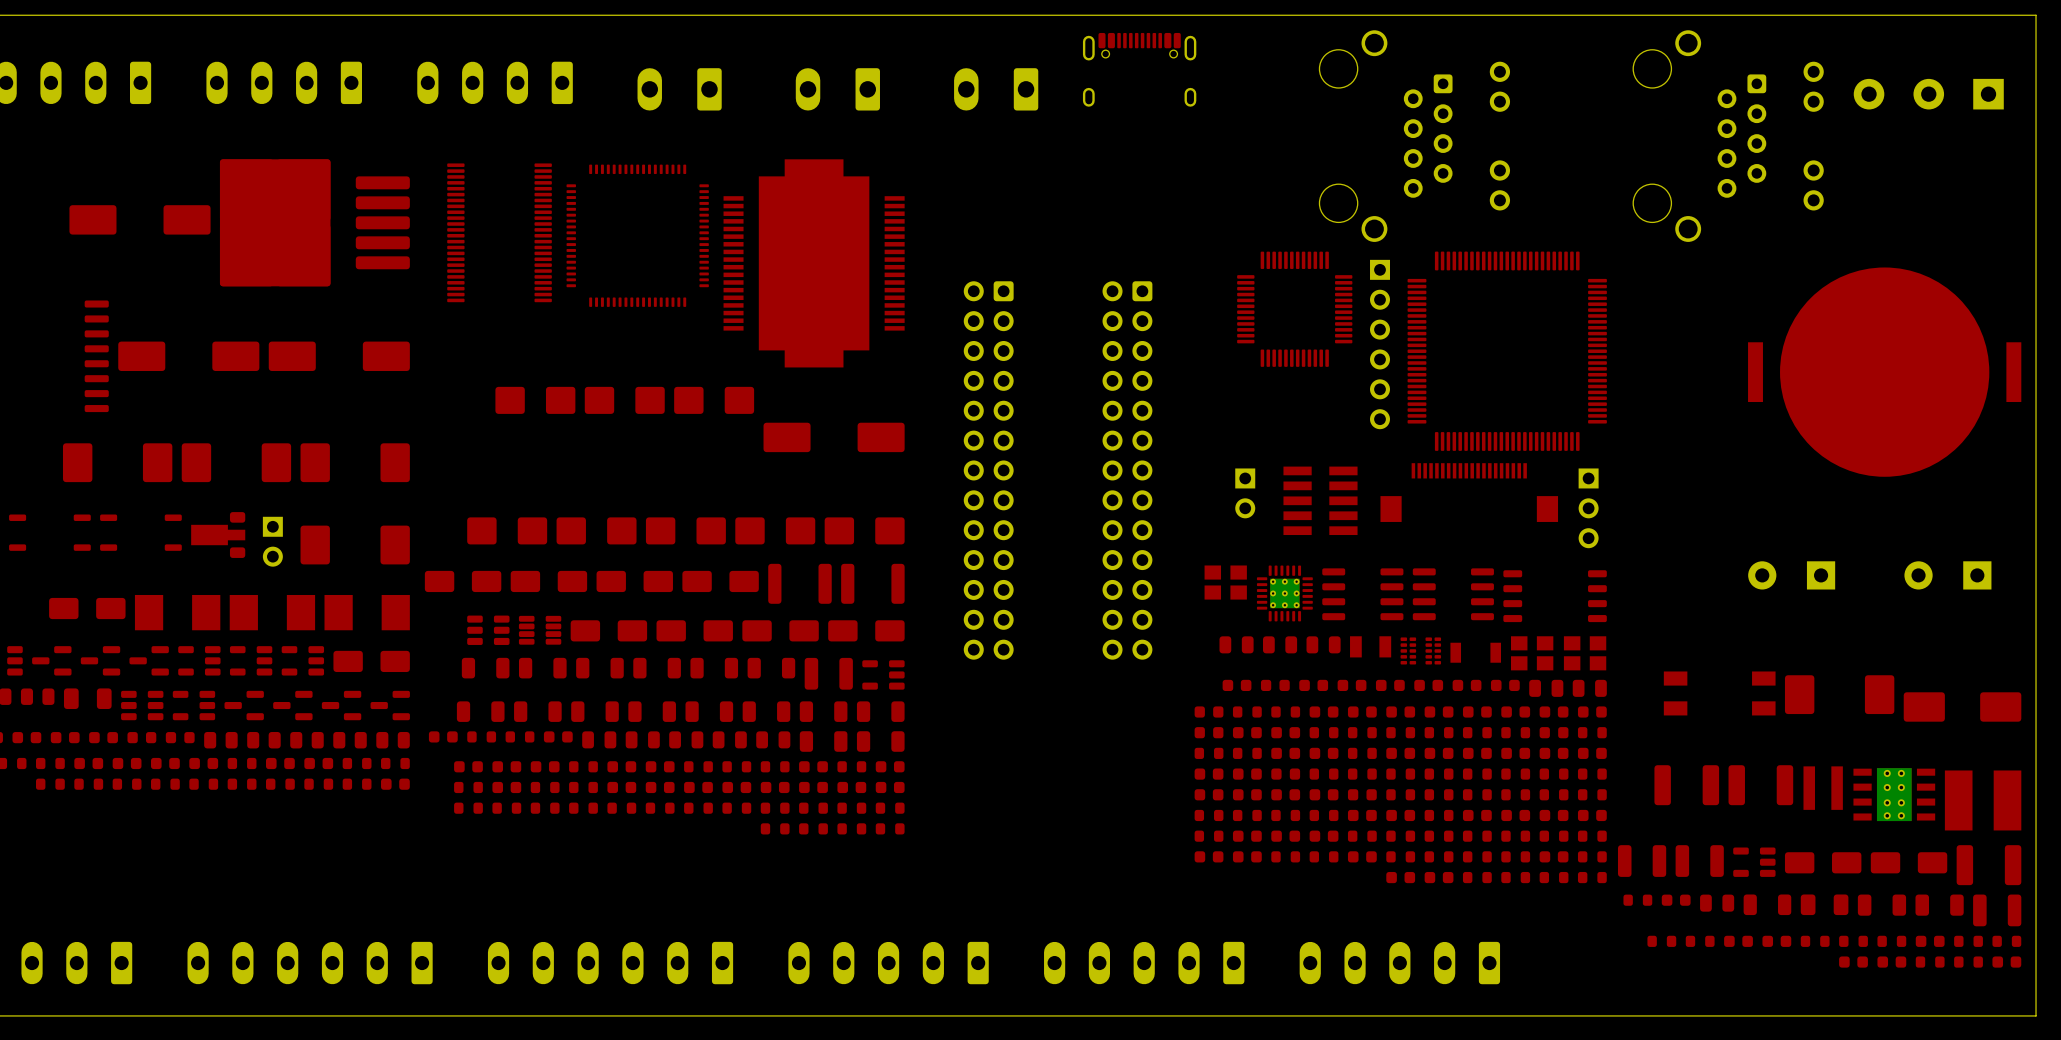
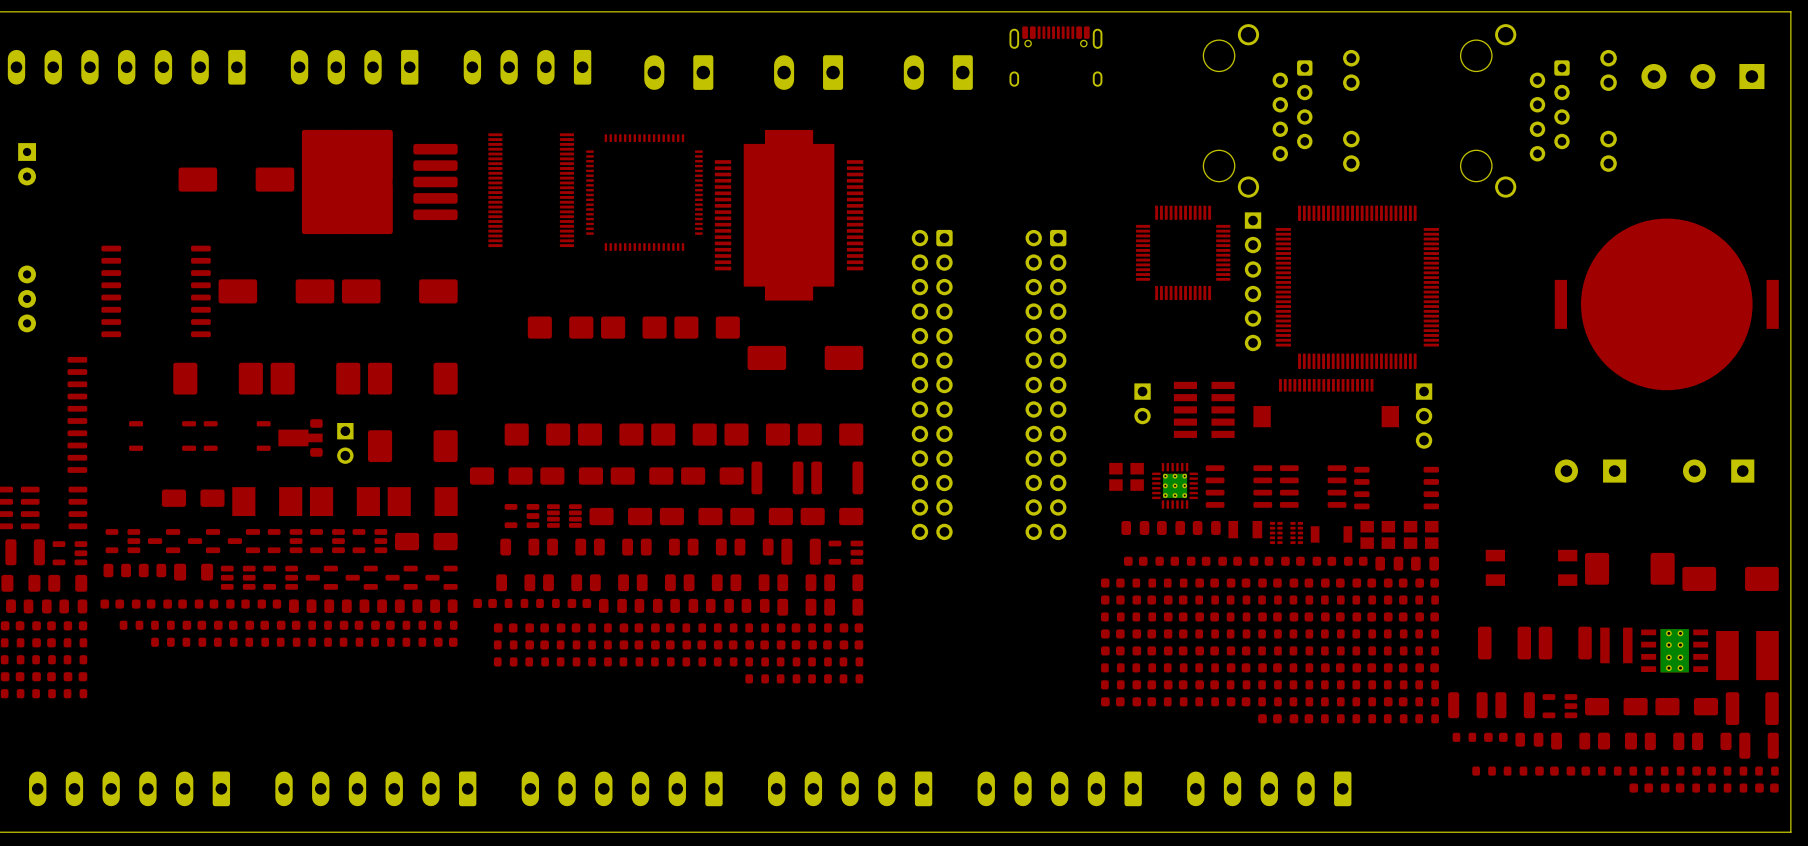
part footprint: [467, 615, 510, 645] -> [504, 503, 540, 529]

